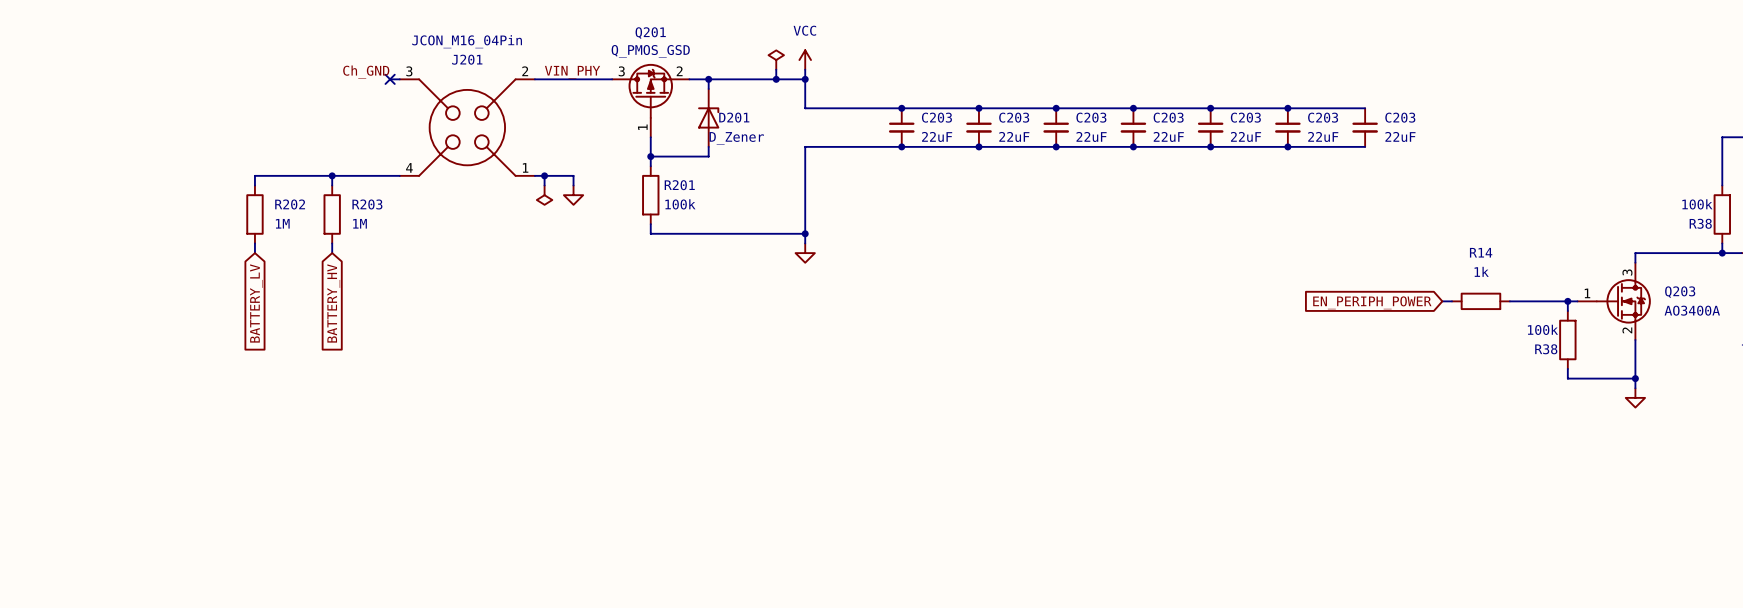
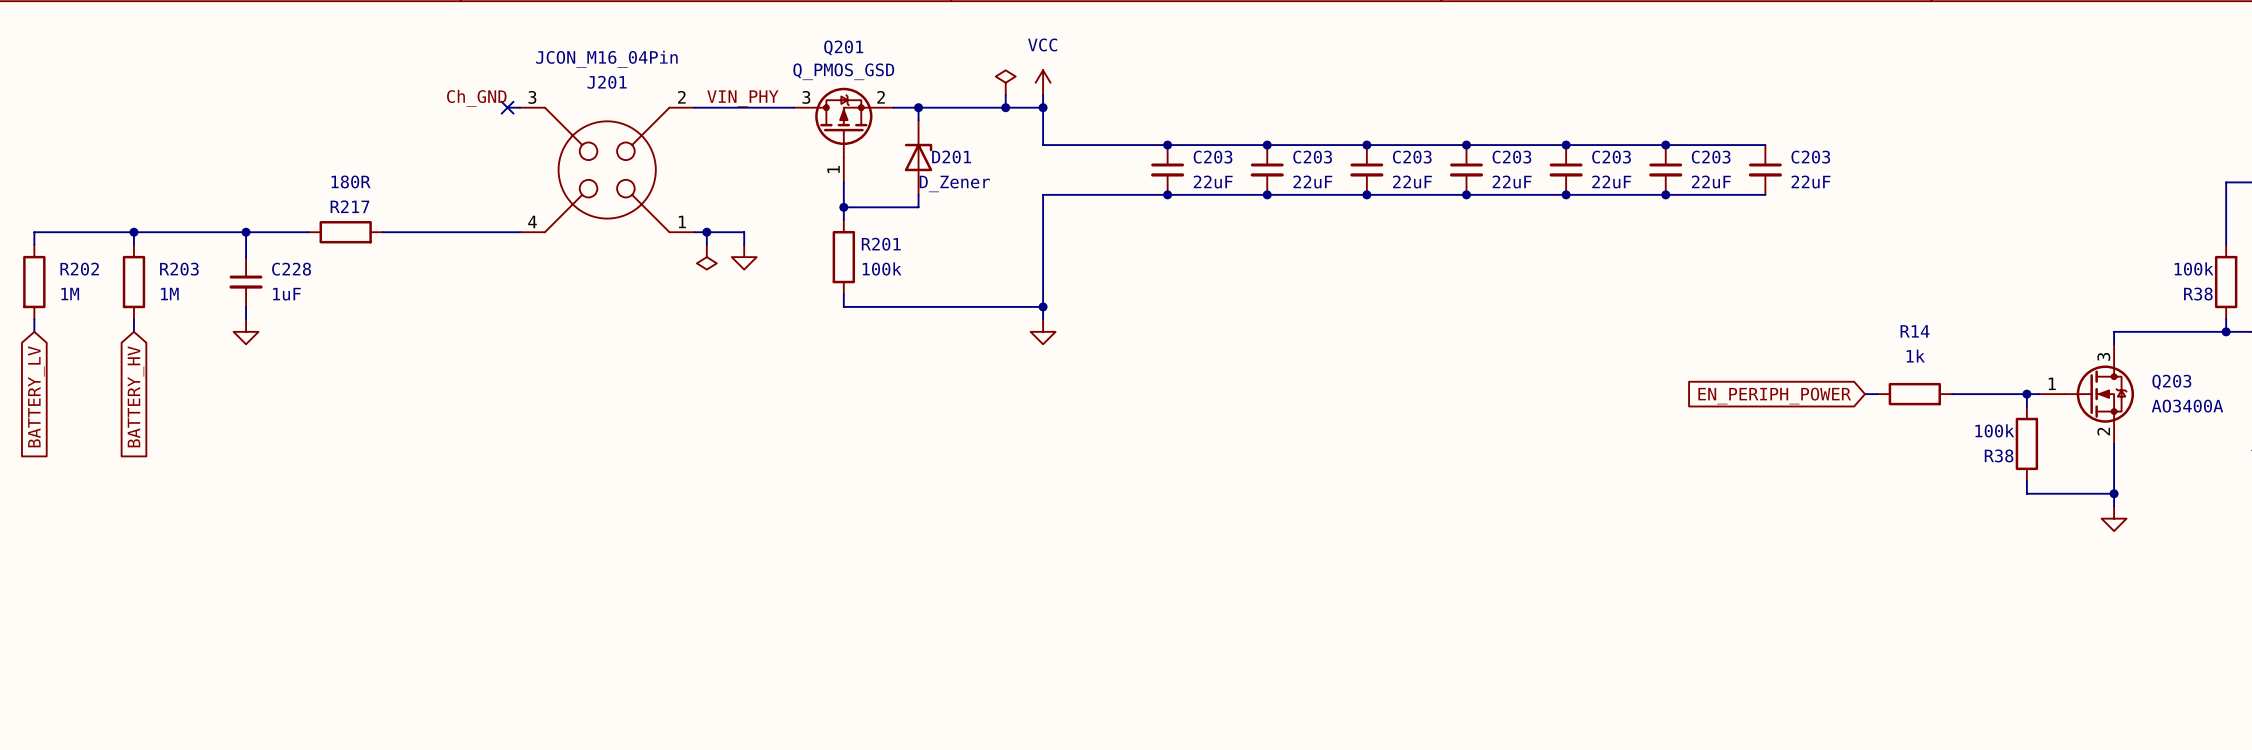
wire: none -> (133, 232) (133, 244)
junction: none -> (133, 232)
wire: none -> (246, 232) (246, 257)
junction: none -> (246, 232)
wire: none -> (308, 232) (34, 232) (34, 244)
R217: none -> 180R (345, 232)
wire: (293, 175) (254, 175) (254, 185) -> none
wire: (332, 175) (332, 185) -> none
junction: (332, 175) -> none
C228: none -> 1uF (246, 282)
R202 position: (254, 214) -> (34, 282)
R203 position: (332, 214) -> (133, 282)
wire: none -> (34, 319) (34, 331)
wire: none -> (133, 319) (133, 331)
wire: (254, 243) (254, 253) -> (246, 306) (246, 319)
wire: (332, 243) (332, 253) -> none
power symbol: none -> (246, 331)
global label: none -> BATTERY_LV (36, 396)
global label: none -> BATTERY_HV (135, 396)
global label: BATTERY_LV (256, 303) -> none
global label: BATTERY_HV (333, 303) -> none

